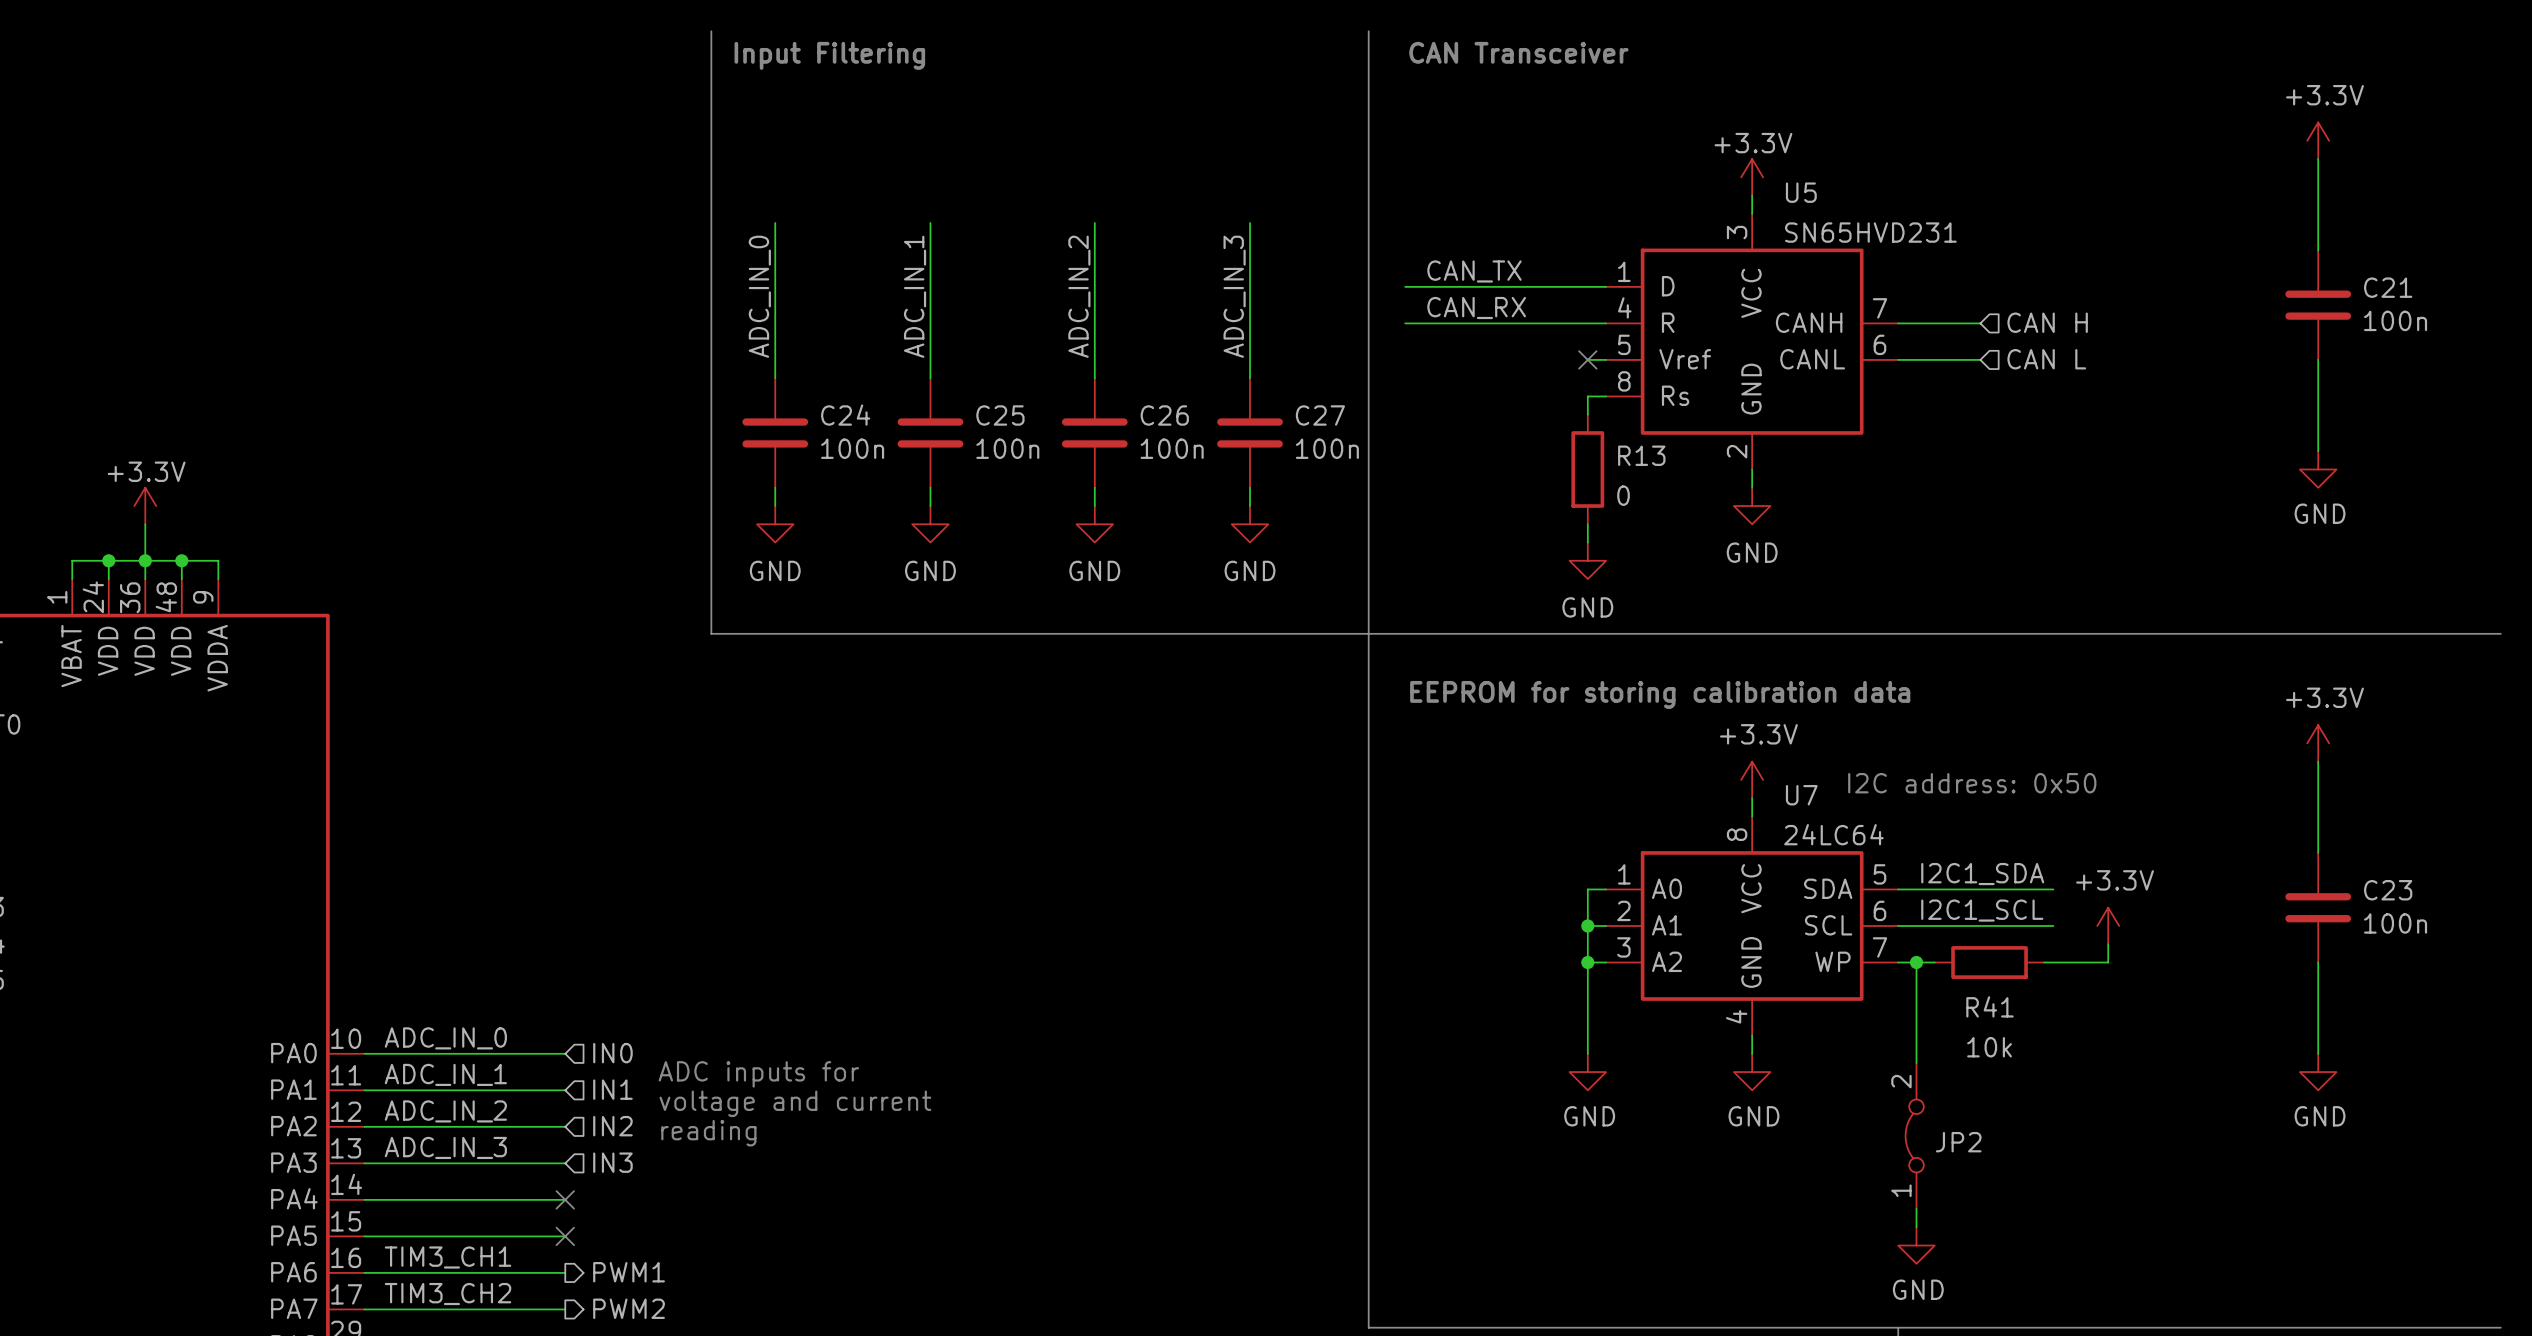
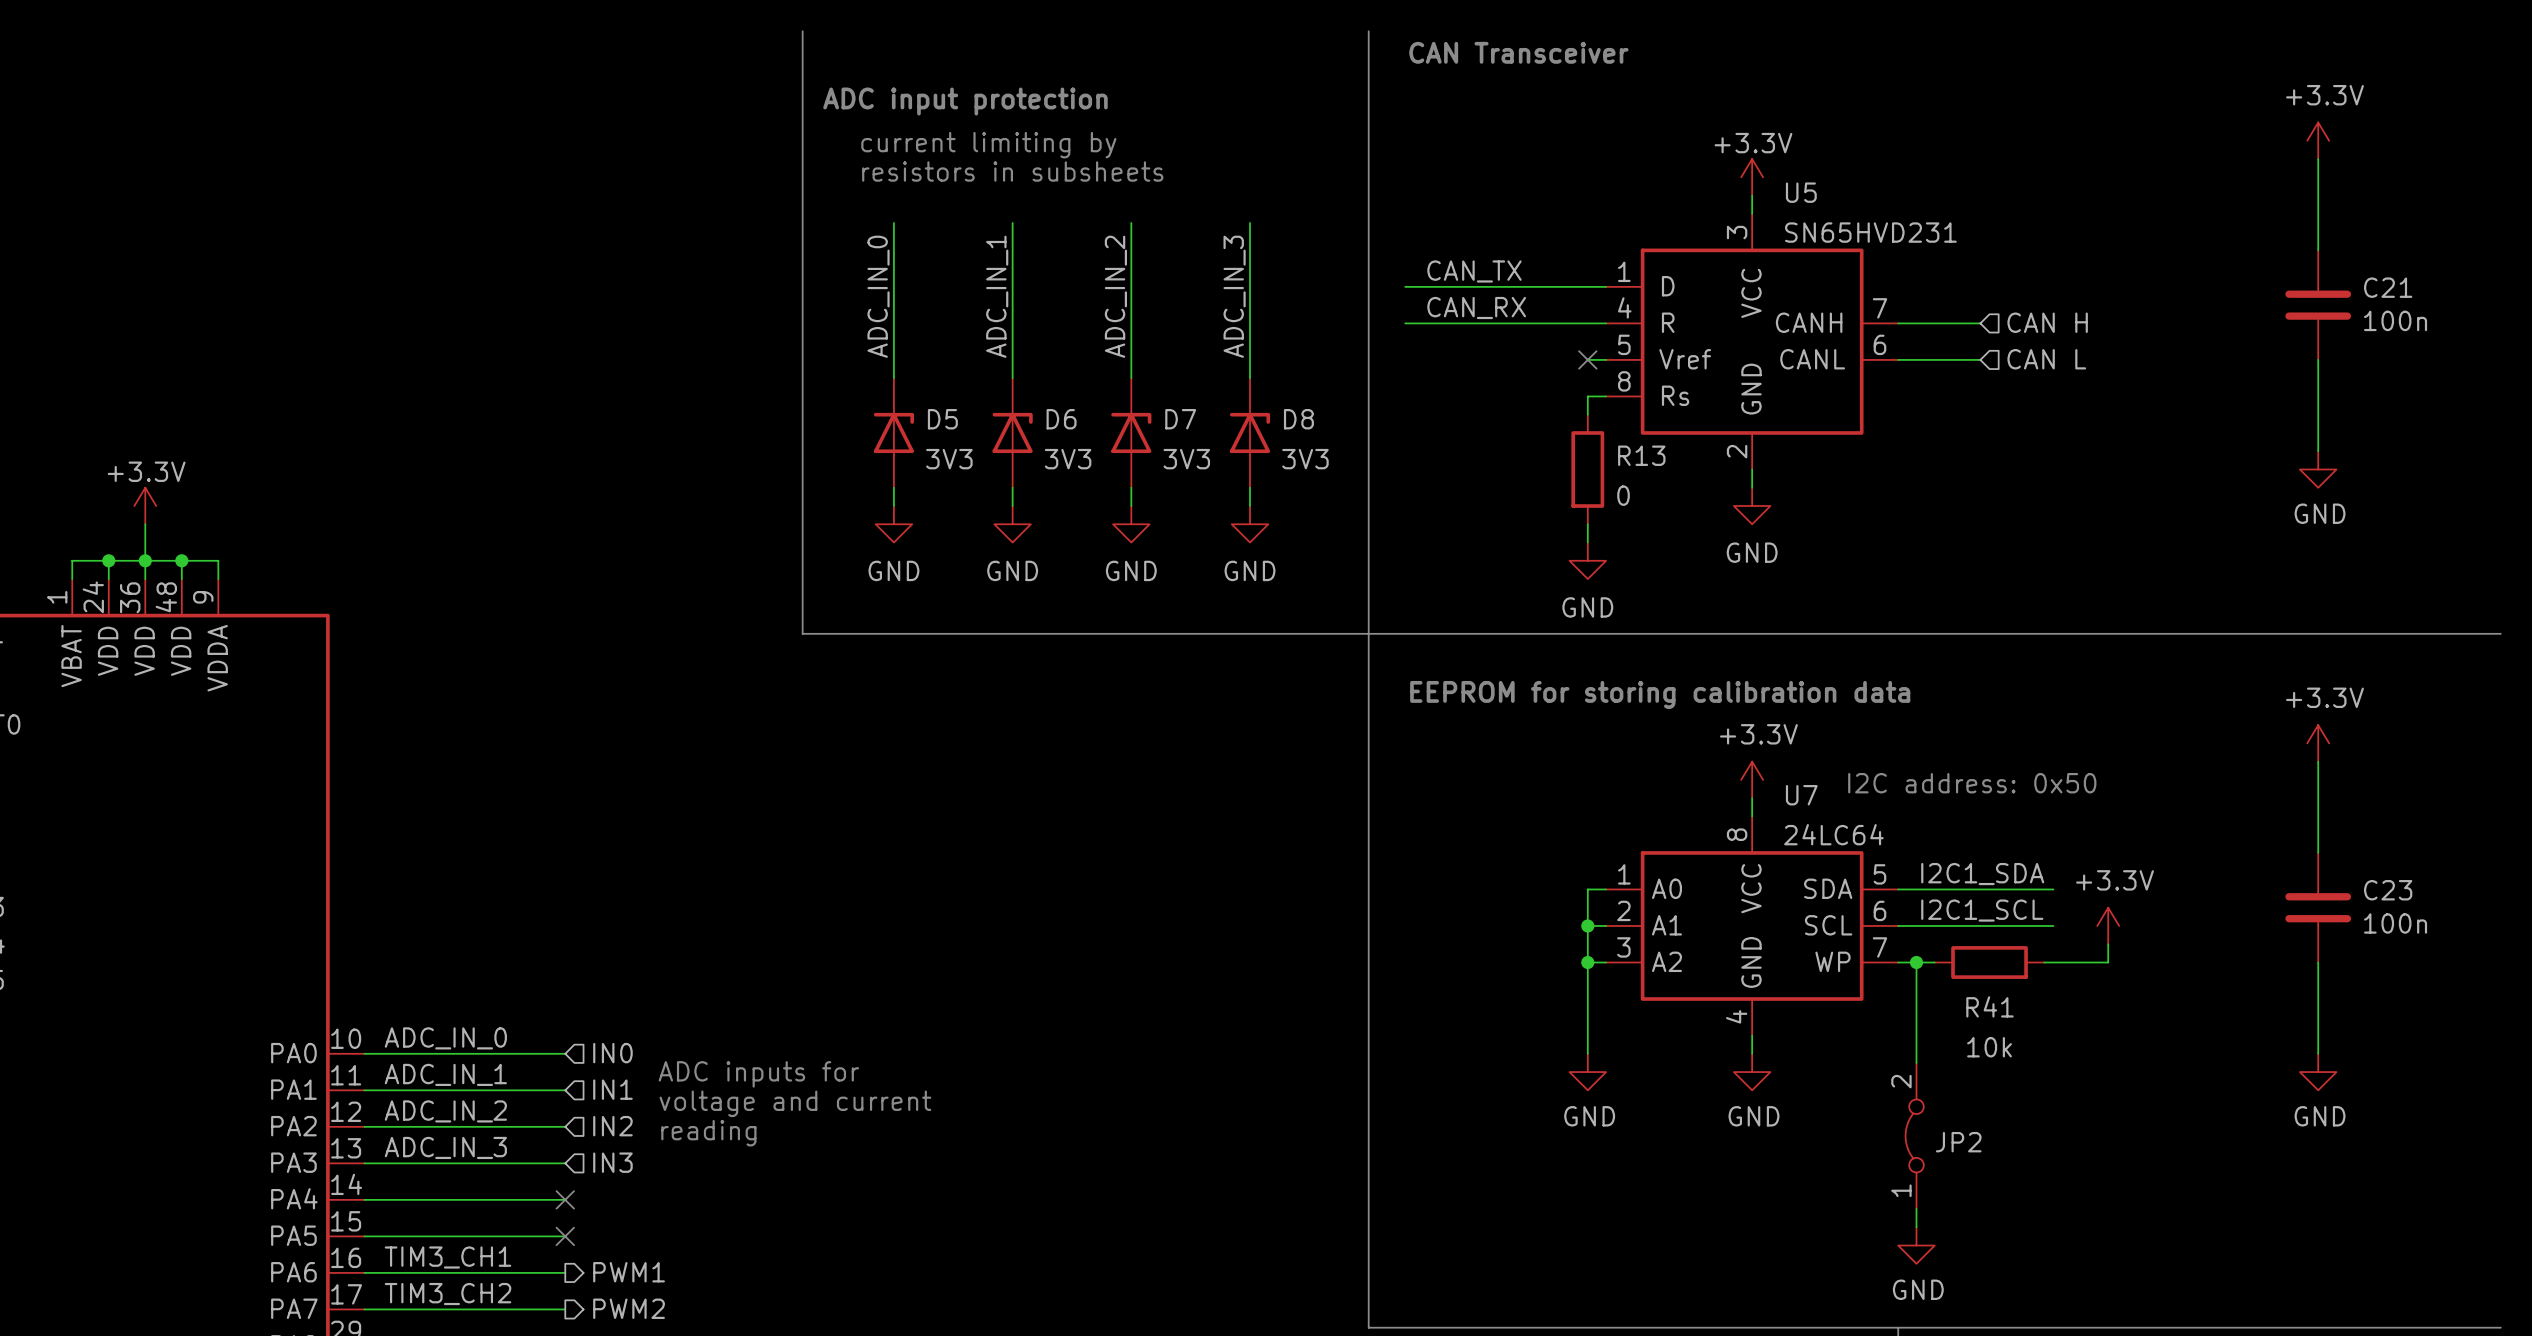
line: (711, 31) (711, 633) (802, 633) -> (802, 31) (802, 633)
text: Input Filtering (829, 55) -> none
text: none -> ADC input protection (965, 101)
text: none -> current limiting by (988, 145)
text: none -> resistors in subsheets (1012, 171)
wire: (775, 222) (775, 378) -> (1012, 222) (1012, 378)
wire: (930, 222) (930, 378) -> (893, 222) (893, 378)
wire: (1094, 222) (1094, 378) -> (1131, 222) (1131, 378)
label position: ADC_IN_0 (759, 296) -> ADC_IN_0 (878, 296)
label position: ADC_IN_1 (915, 296) -> ADC_IN_1 (997, 296)
label position: ADC_IN_2 (1079, 296) -> ADC_IN_2 (1115, 296)
C24: 100n (775, 432) -> none
D5: none -> 3V3 (893, 432)
C25: 100n (930, 432) -> none
D6: none -> 3V3 (1012, 432)
C26: 100n (1094, 432) -> none
D7: none -> 3V3 (1131, 432)
C27: 100n (1250, 432) -> none
D8: none -> 3V3 (1250, 432)
wire: (775, 487) (775, 506) -> (1012, 487) (1012, 506)
wire: (930, 487) (930, 506) -> (893, 487) (893, 506)
wire: (1094, 487) (1094, 506) -> (1131, 487) (1131, 506)
power symbol: GND (775, 524) -> none
power symbol position: GND (930, 524) -> GND (893, 524)
power symbol: none -> GND (1012, 524)
power symbol position: GND (1094, 524) -> GND (1131, 524)

